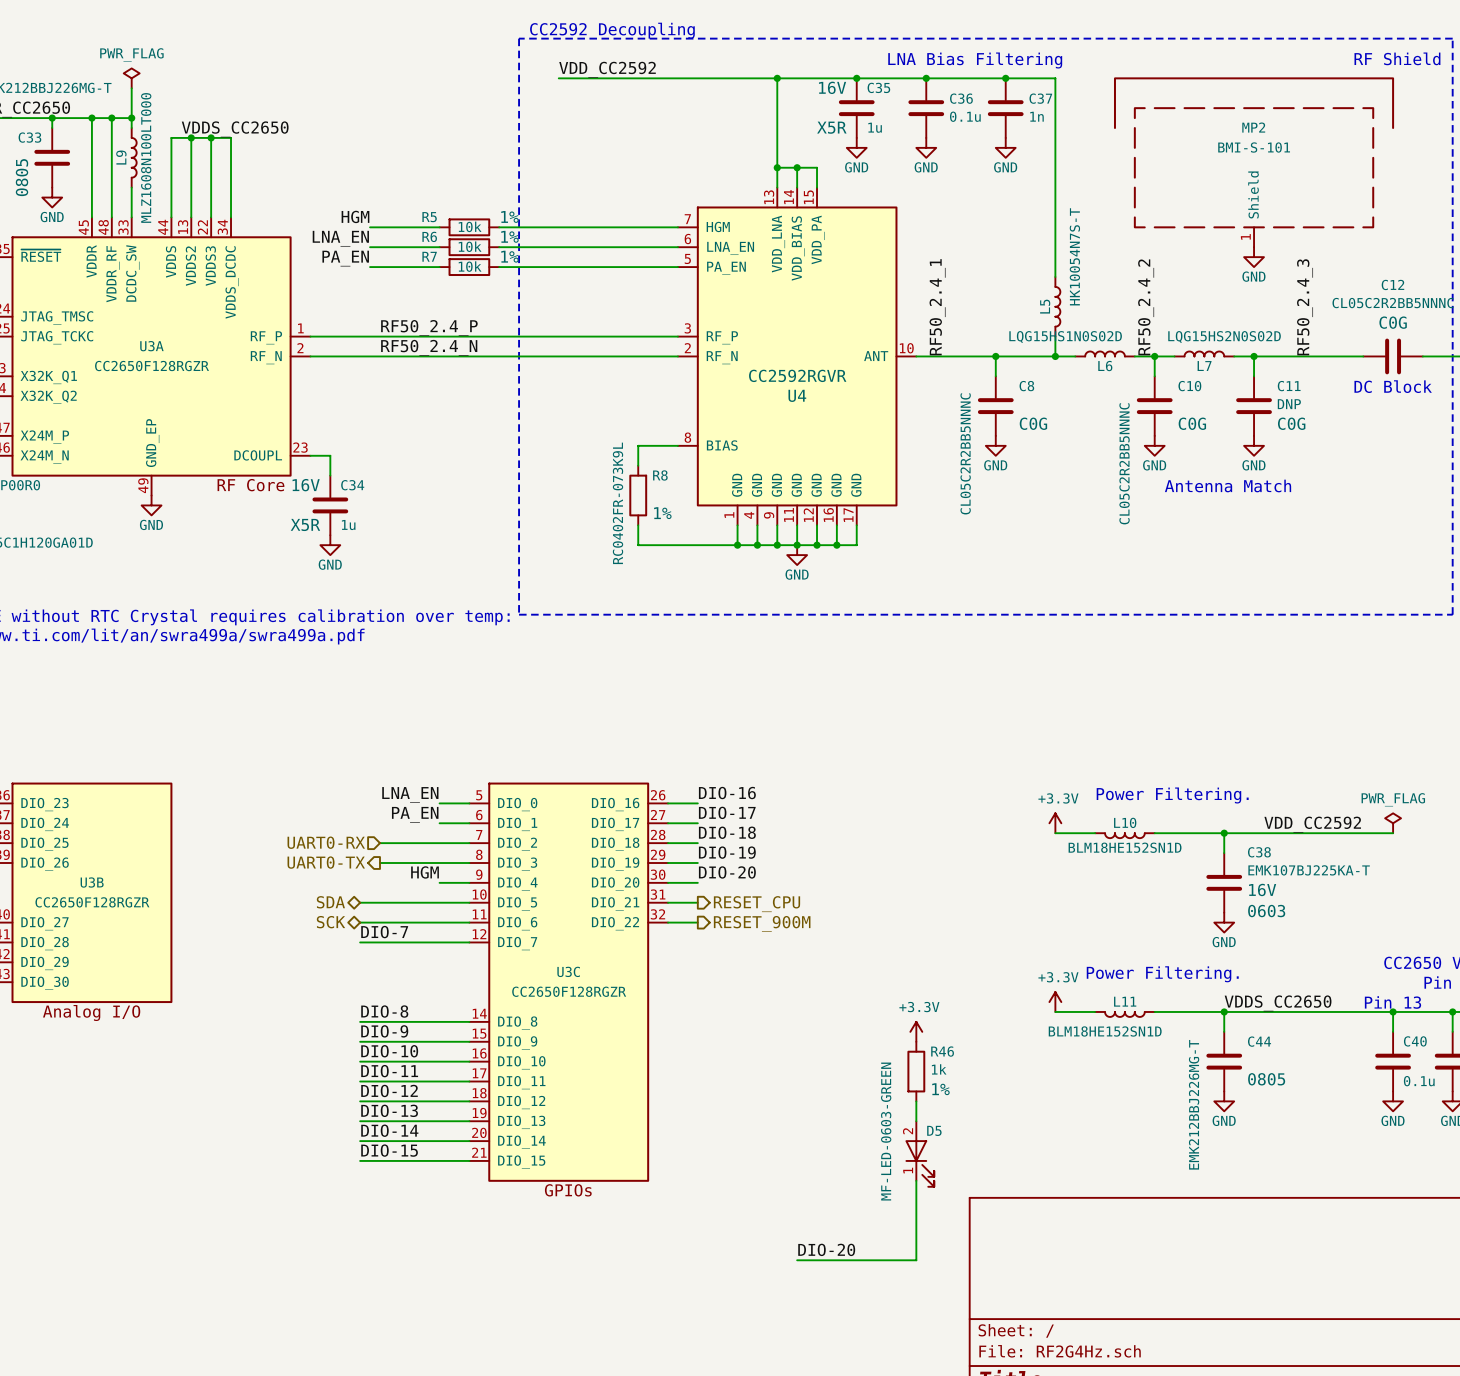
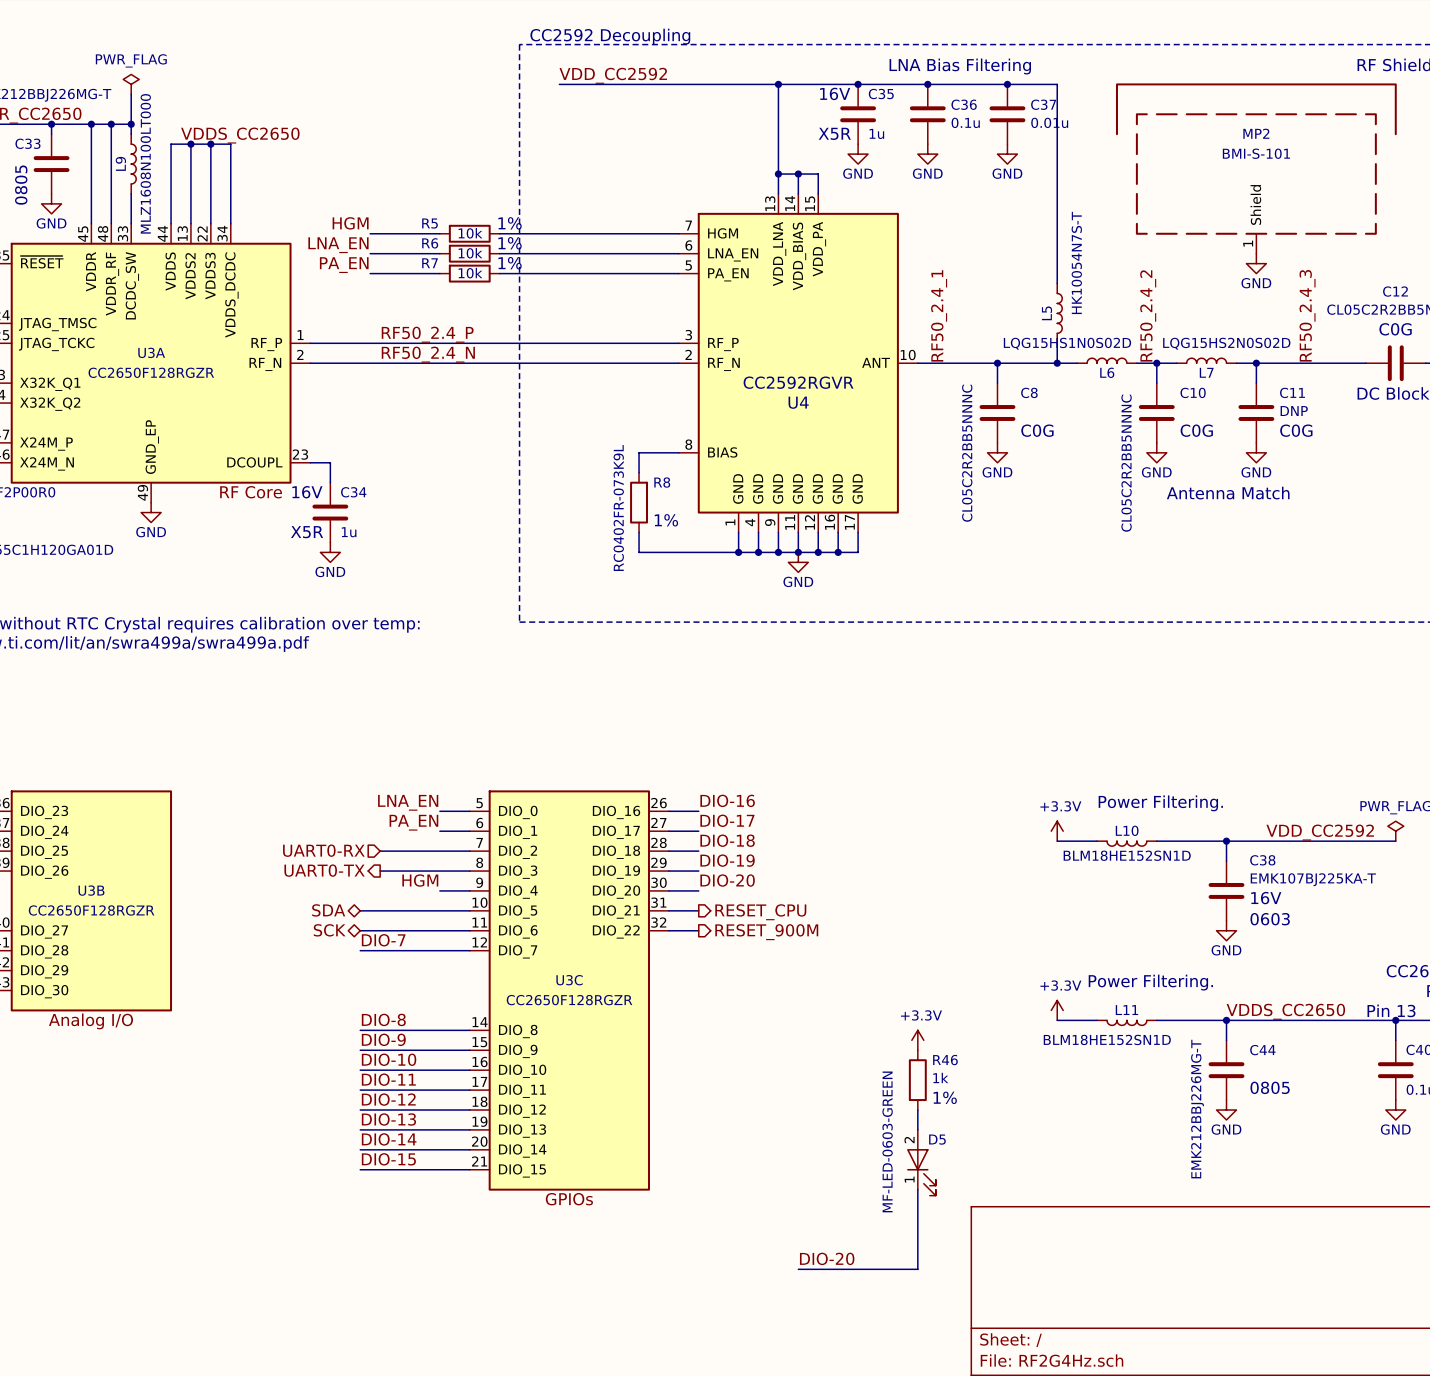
C37 value: 1n (1036, 116) -> 0.01u (1049, 122)

